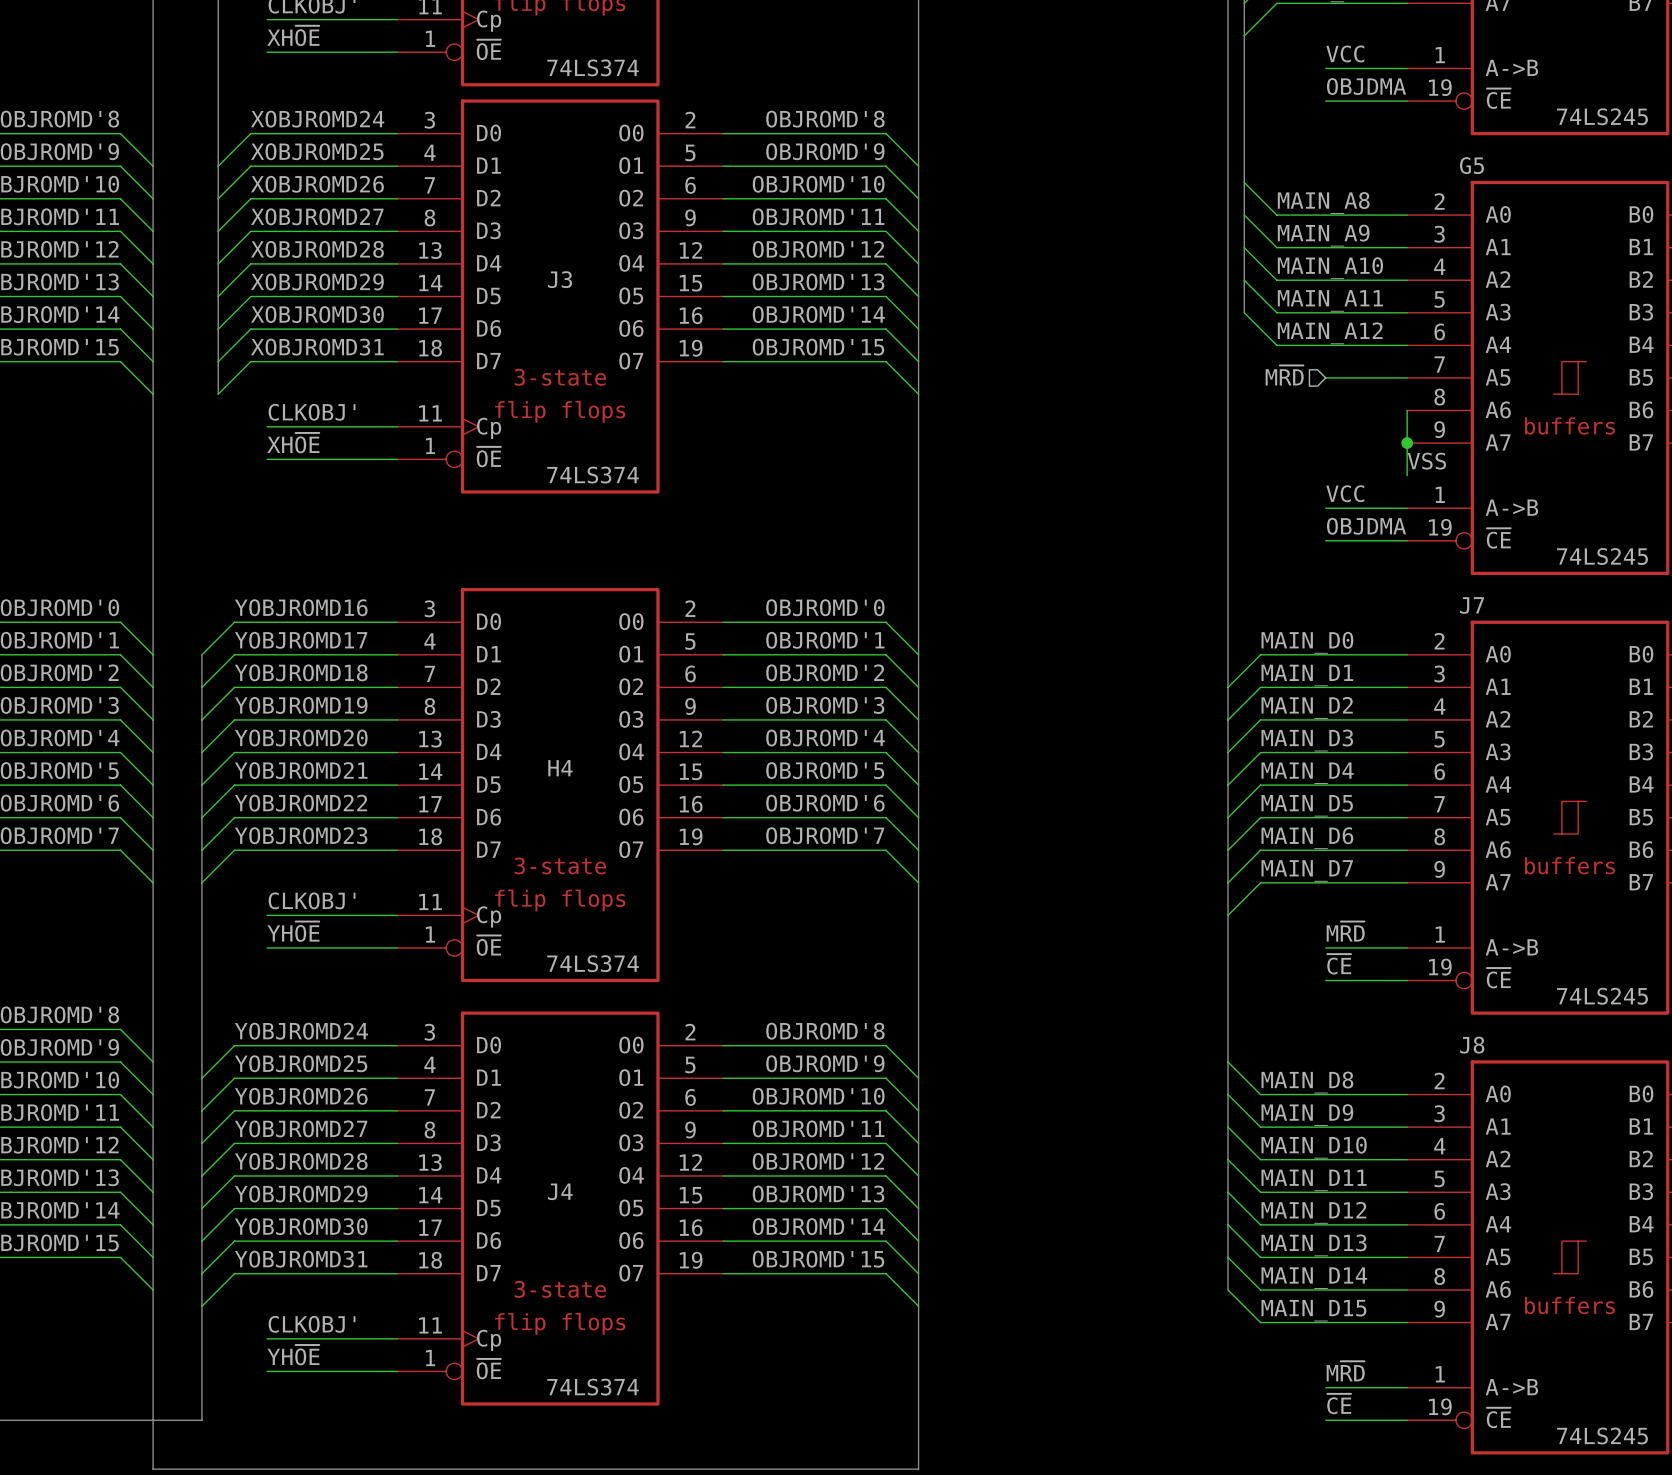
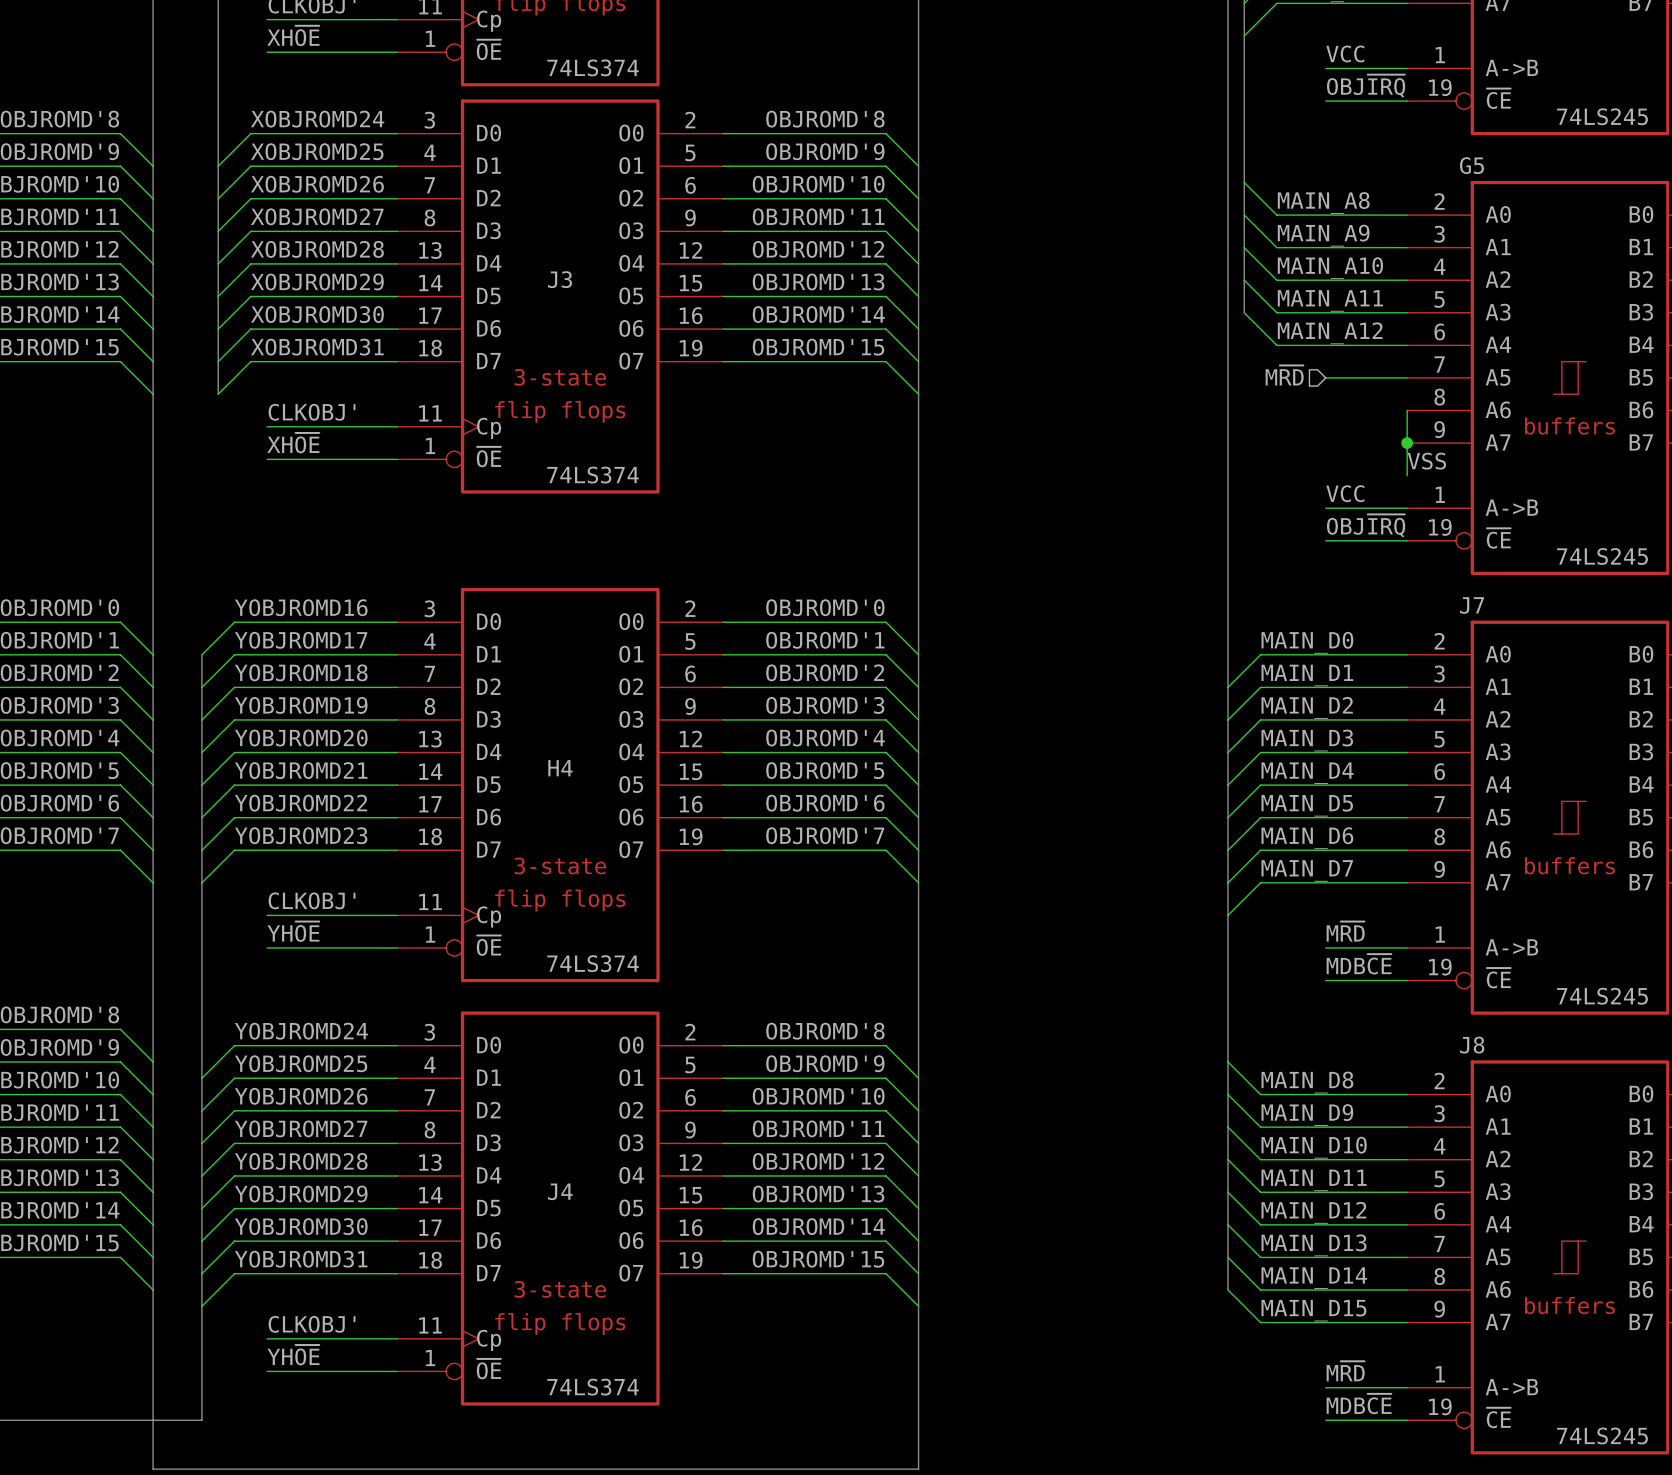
label: OBJDMA (1366, 86) -> OBJ~{IRQ} (1366, 86)
label: OBJDMA (1366, 526) -> OBJ~{IRQ} (1366, 525)
label: ~{CE} (1339, 964) -> MDB~{CE} (1359, 964)
label: ~{CE} (1339, 1404) -> MDB~{CE} (1359, 1404)

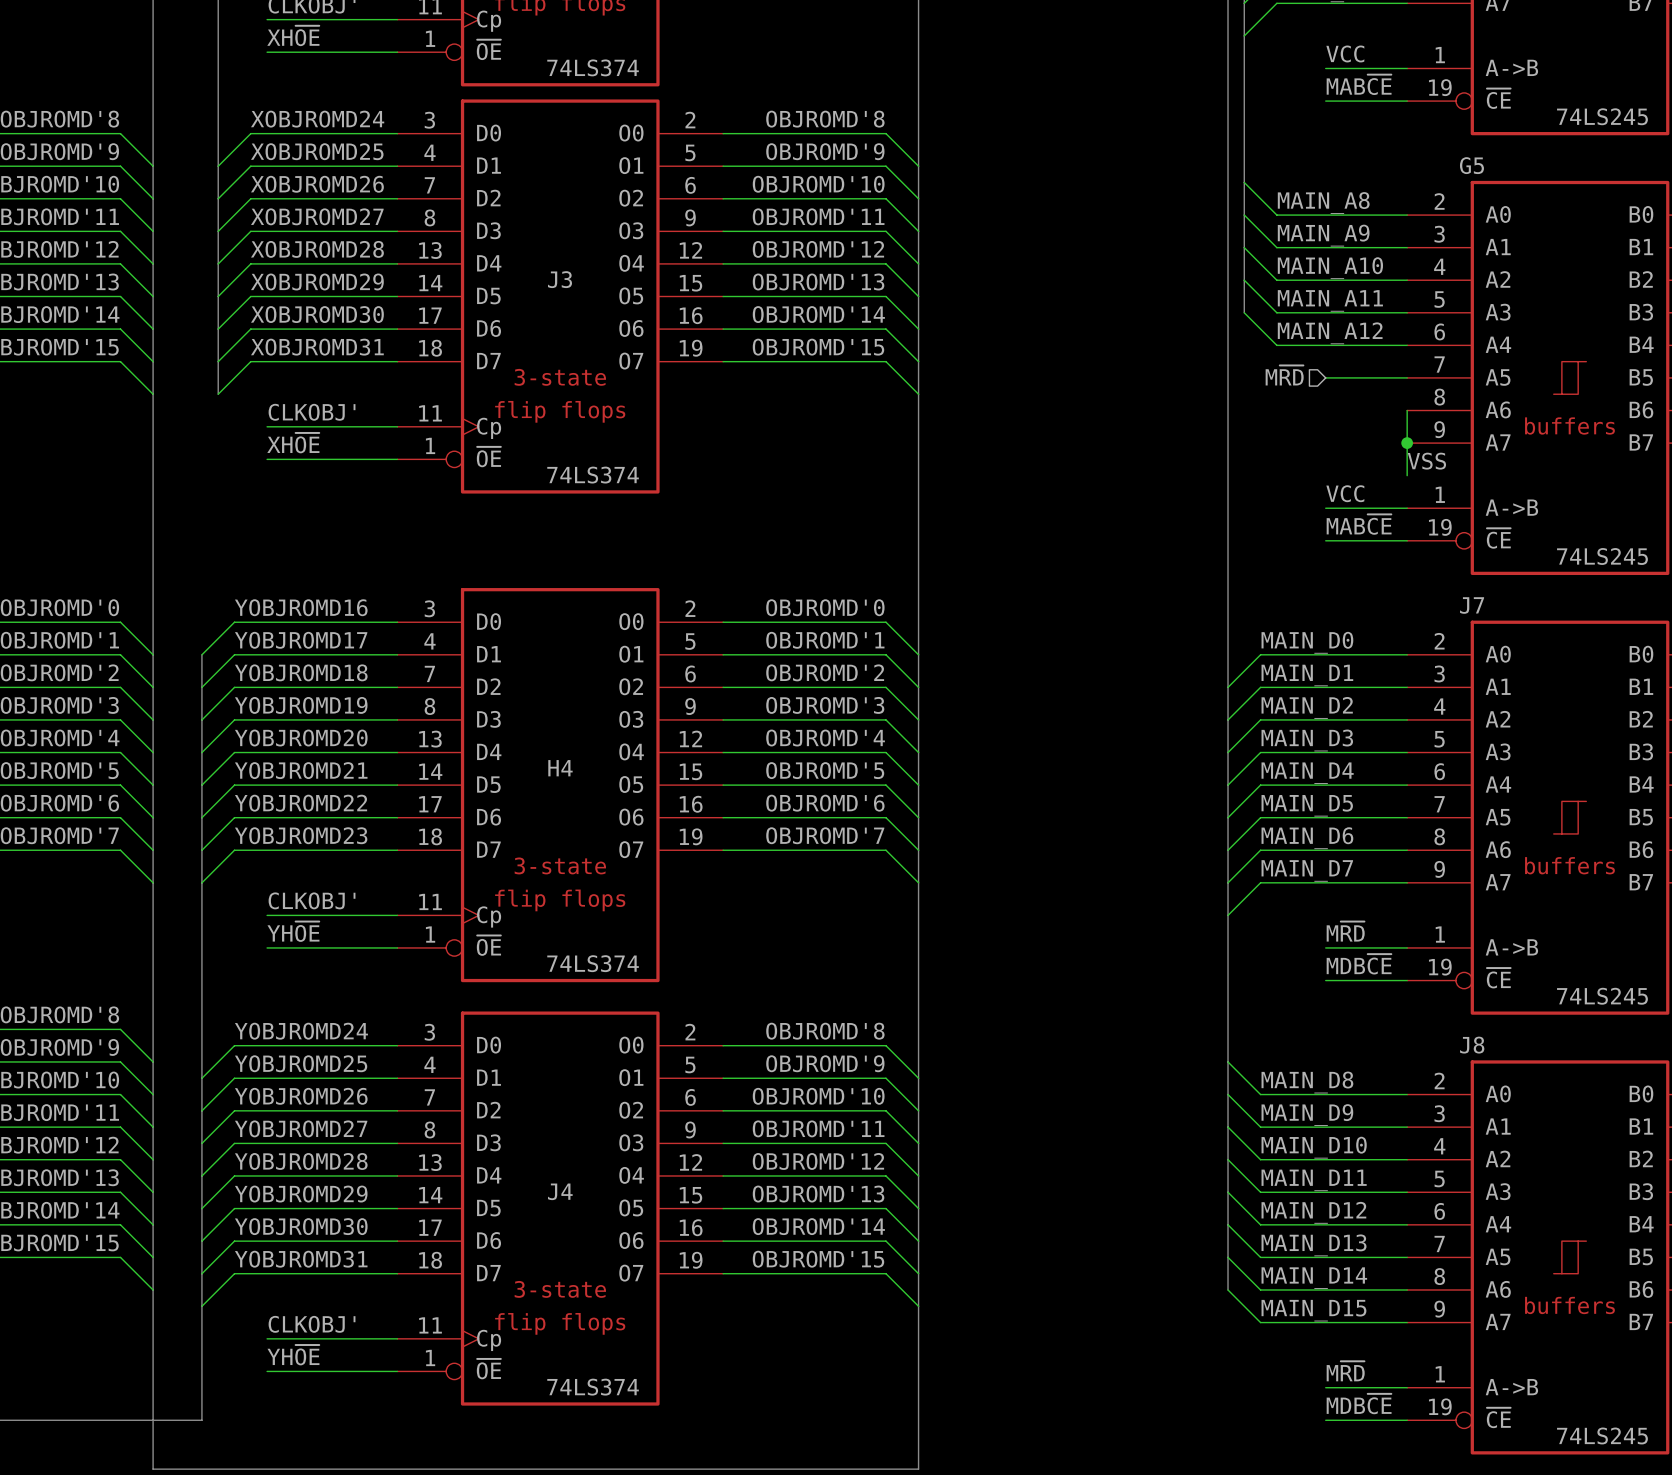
label: OBJ~{IRQ} (1366, 86) -> MAB~{CE} (1359, 84)
label: OBJ~{IRQ} (1366, 525) -> MAB~{CE} (1359, 524)

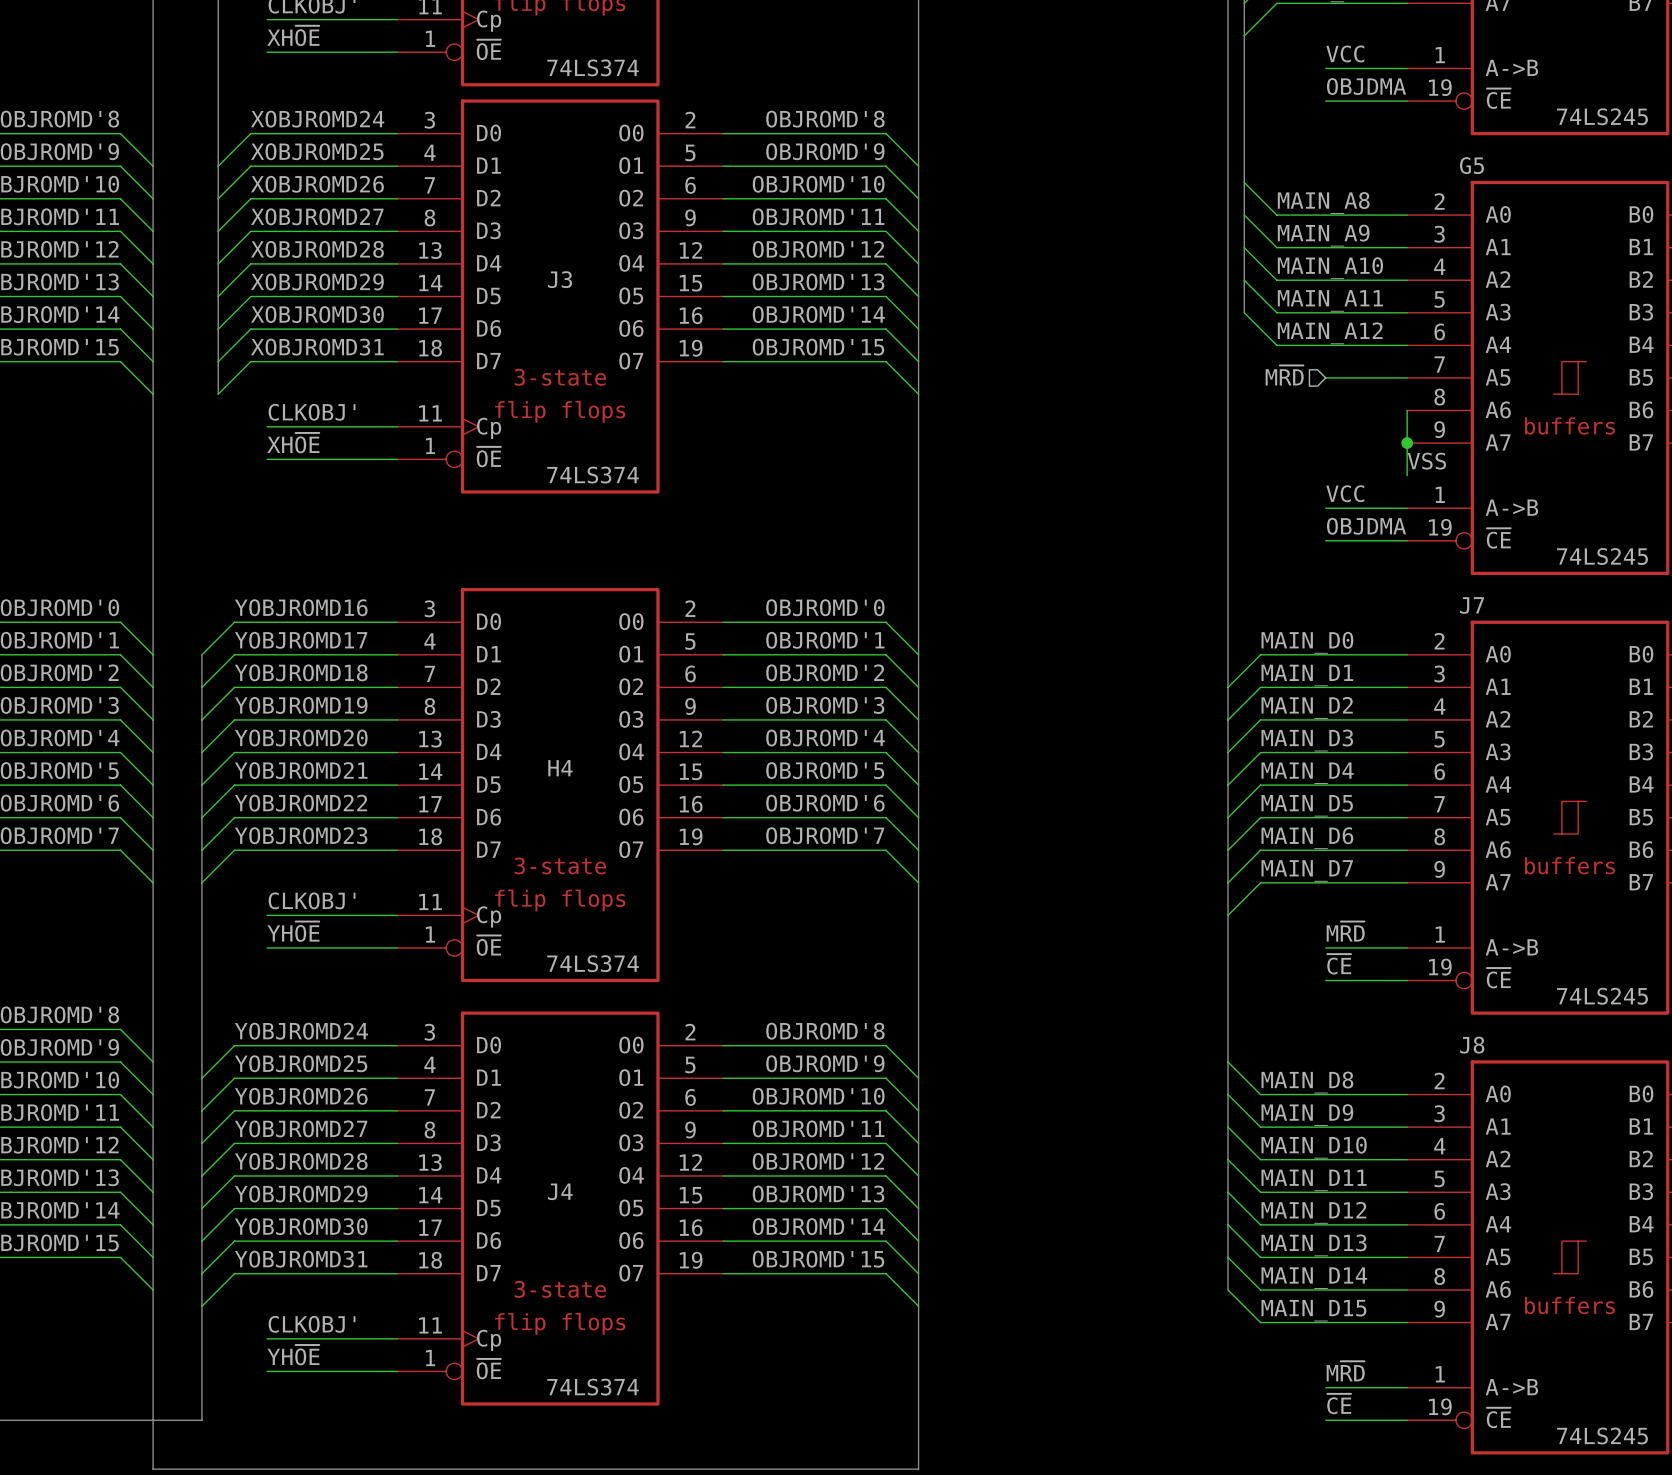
label: MAB~{CE} (1359, 84) -> OBJDMA (1366, 86)
label: MAB~{CE} (1359, 524) -> OBJDMA (1366, 526)
label: MDB~{CE} (1359, 964) -> ~{CE} (1339, 964)
label: MDB~{CE} (1359, 1404) -> ~{CE} (1339, 1404)

